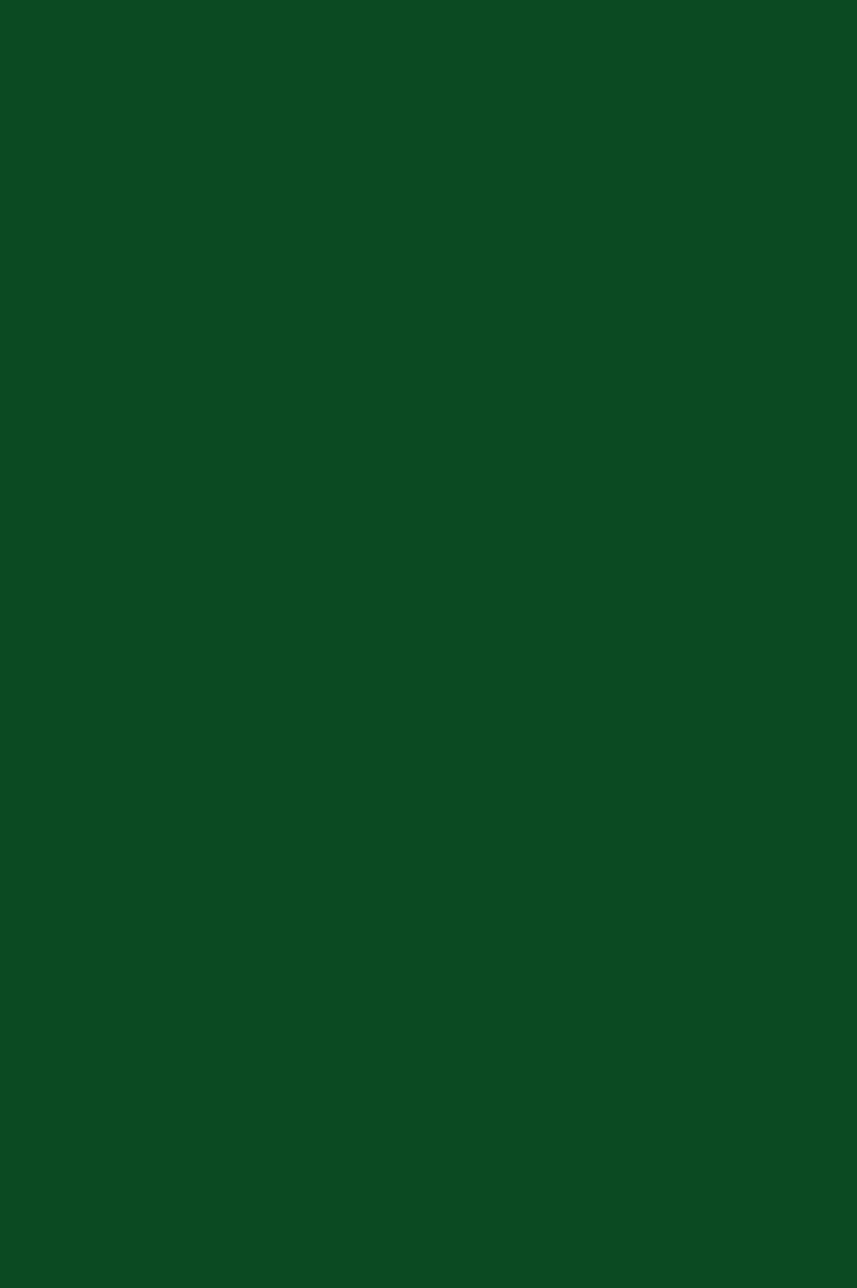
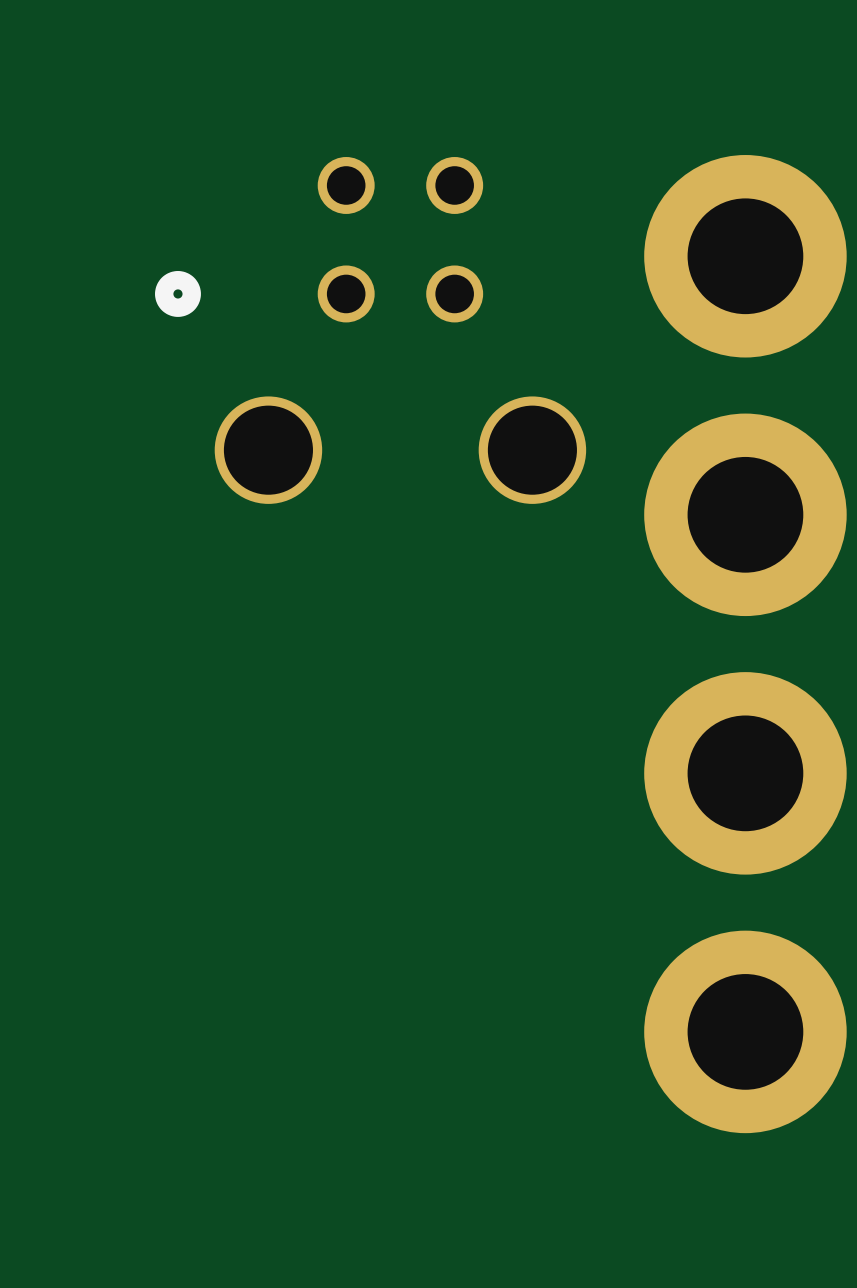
part: none -> (745, 256)
part: none -> (370, 330)
part: none -> (745, 514)
part: none -> (745, 773)
part: none -> (745, 1031)

